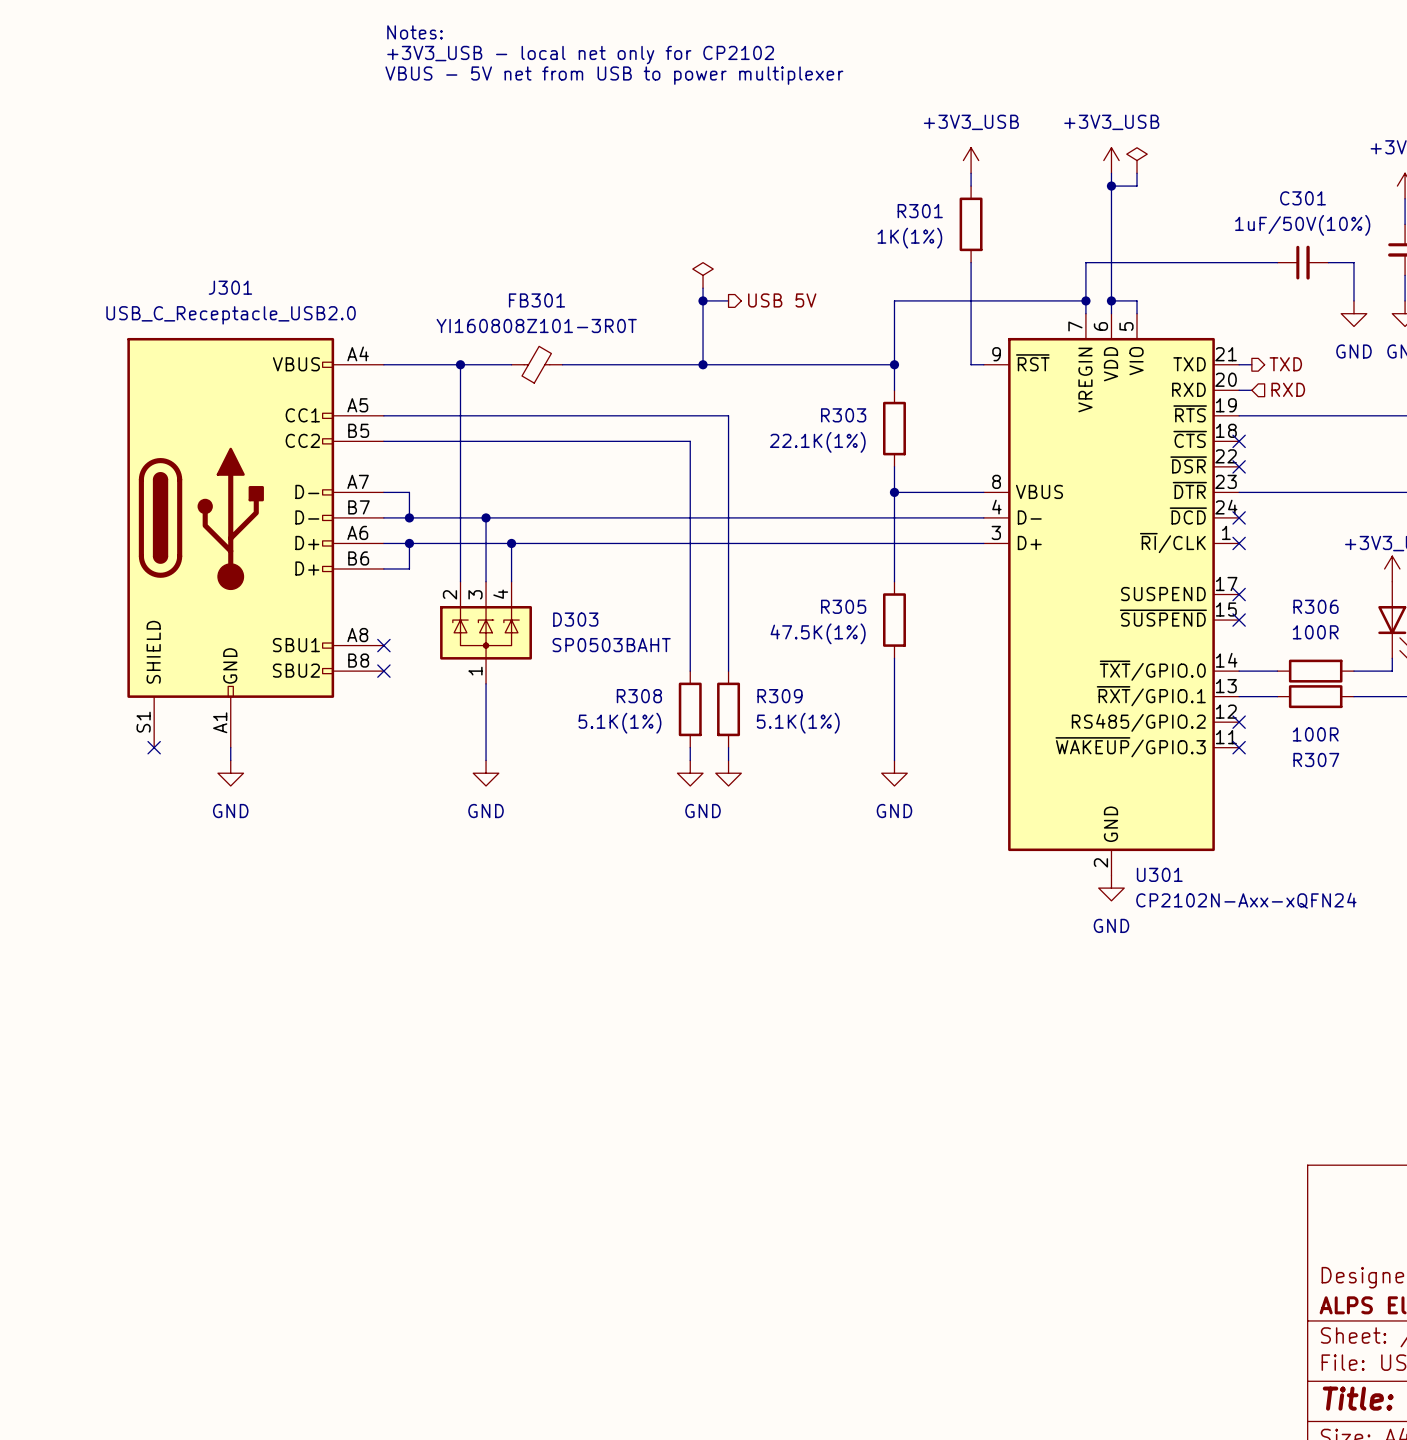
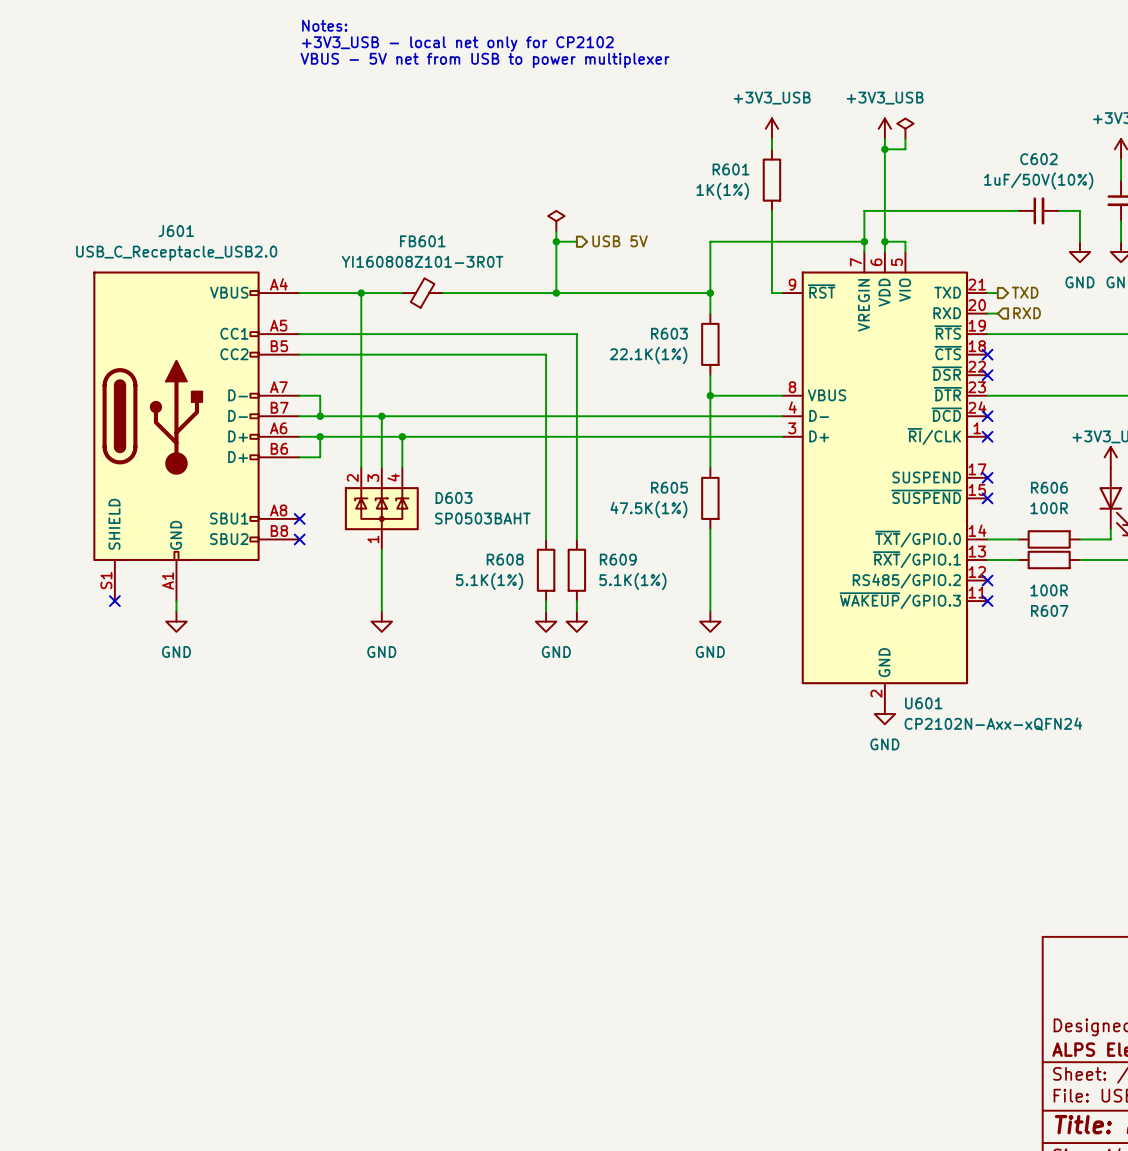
C301 name: C301 (1303, 198) -> C602 (1038, 159)
R301 name: R301 (920, 211) -> R601 (731, 169)
J301 name: J301 (230, 287) -> J601 (176, 231)
FB301 name: FB301 (537, 300) -> FB601 (422, 241)
R303 name: R303 (843, 415) -> R603 (669, 333)
R305 name: R305 (843, 606) -> R605 (669, 487)
R306 name: R306 (1316, 606) -> R606 (1049, 487)
D303 name: D303 (575, 619) -> D603 (454, 498)
R308 name: R308 (639, 696) -> R608 (505, 559)
R309 name: R309 (780, 696) -> R609 (618, 559)
R307 name: R307 (1316, 759) -> R607 (1049, 610)
U301 name: U301 (1159, 874) -> U601 (923, 703)

